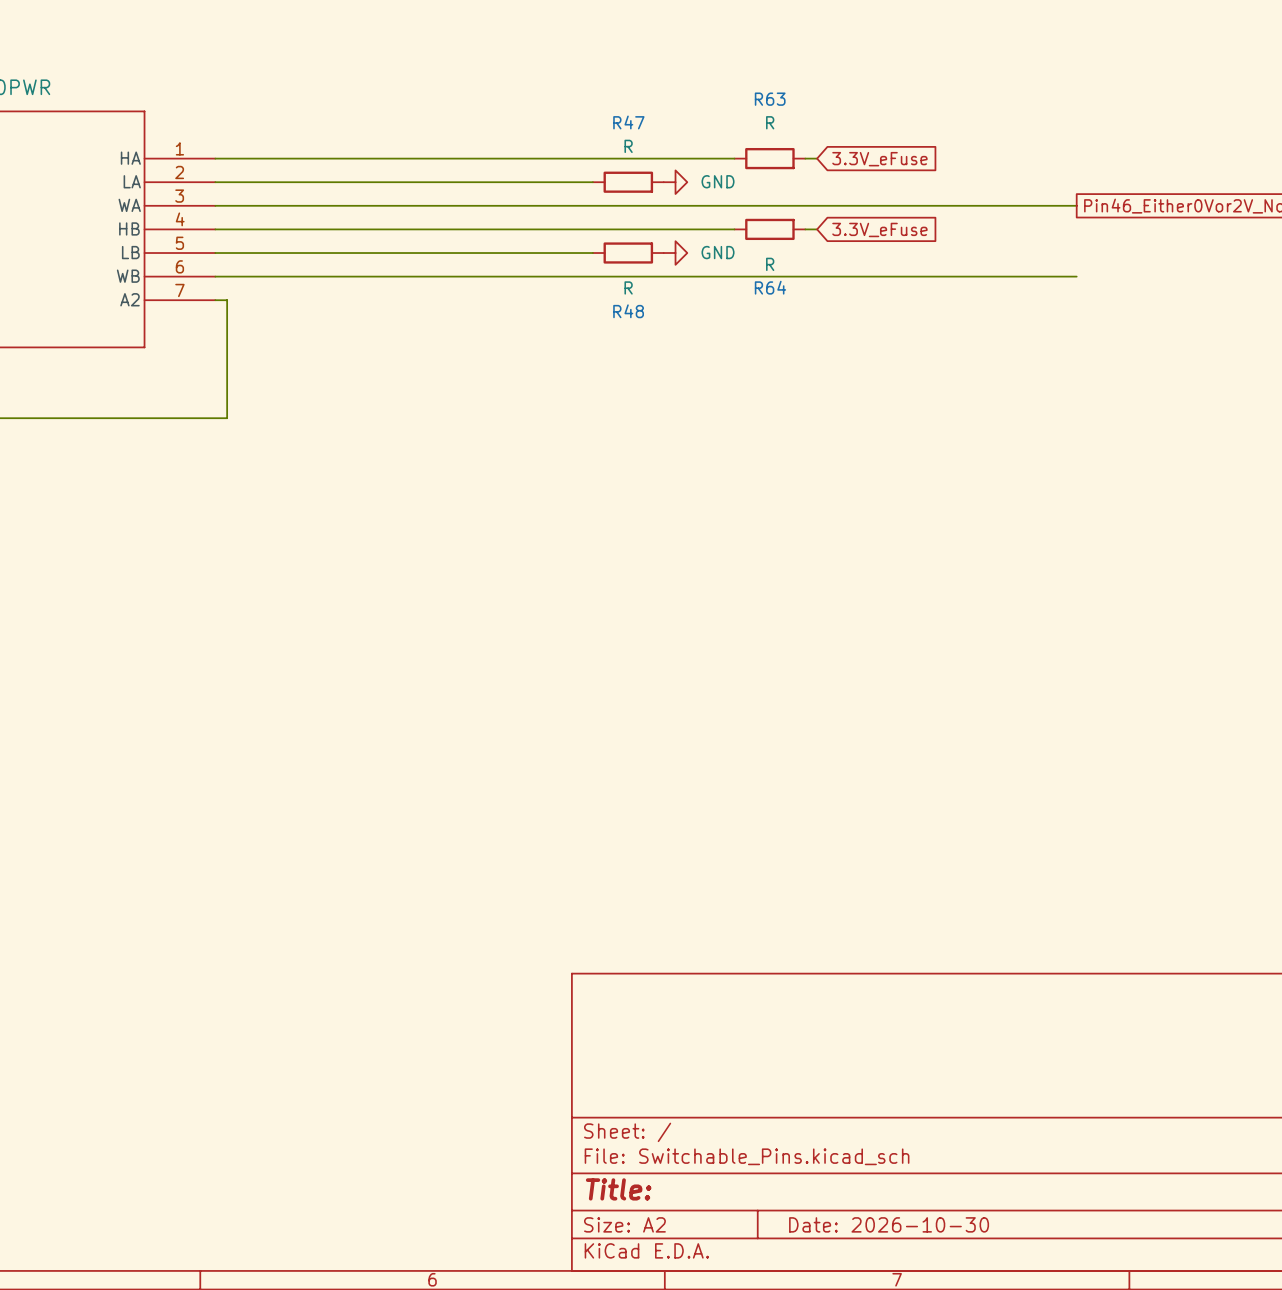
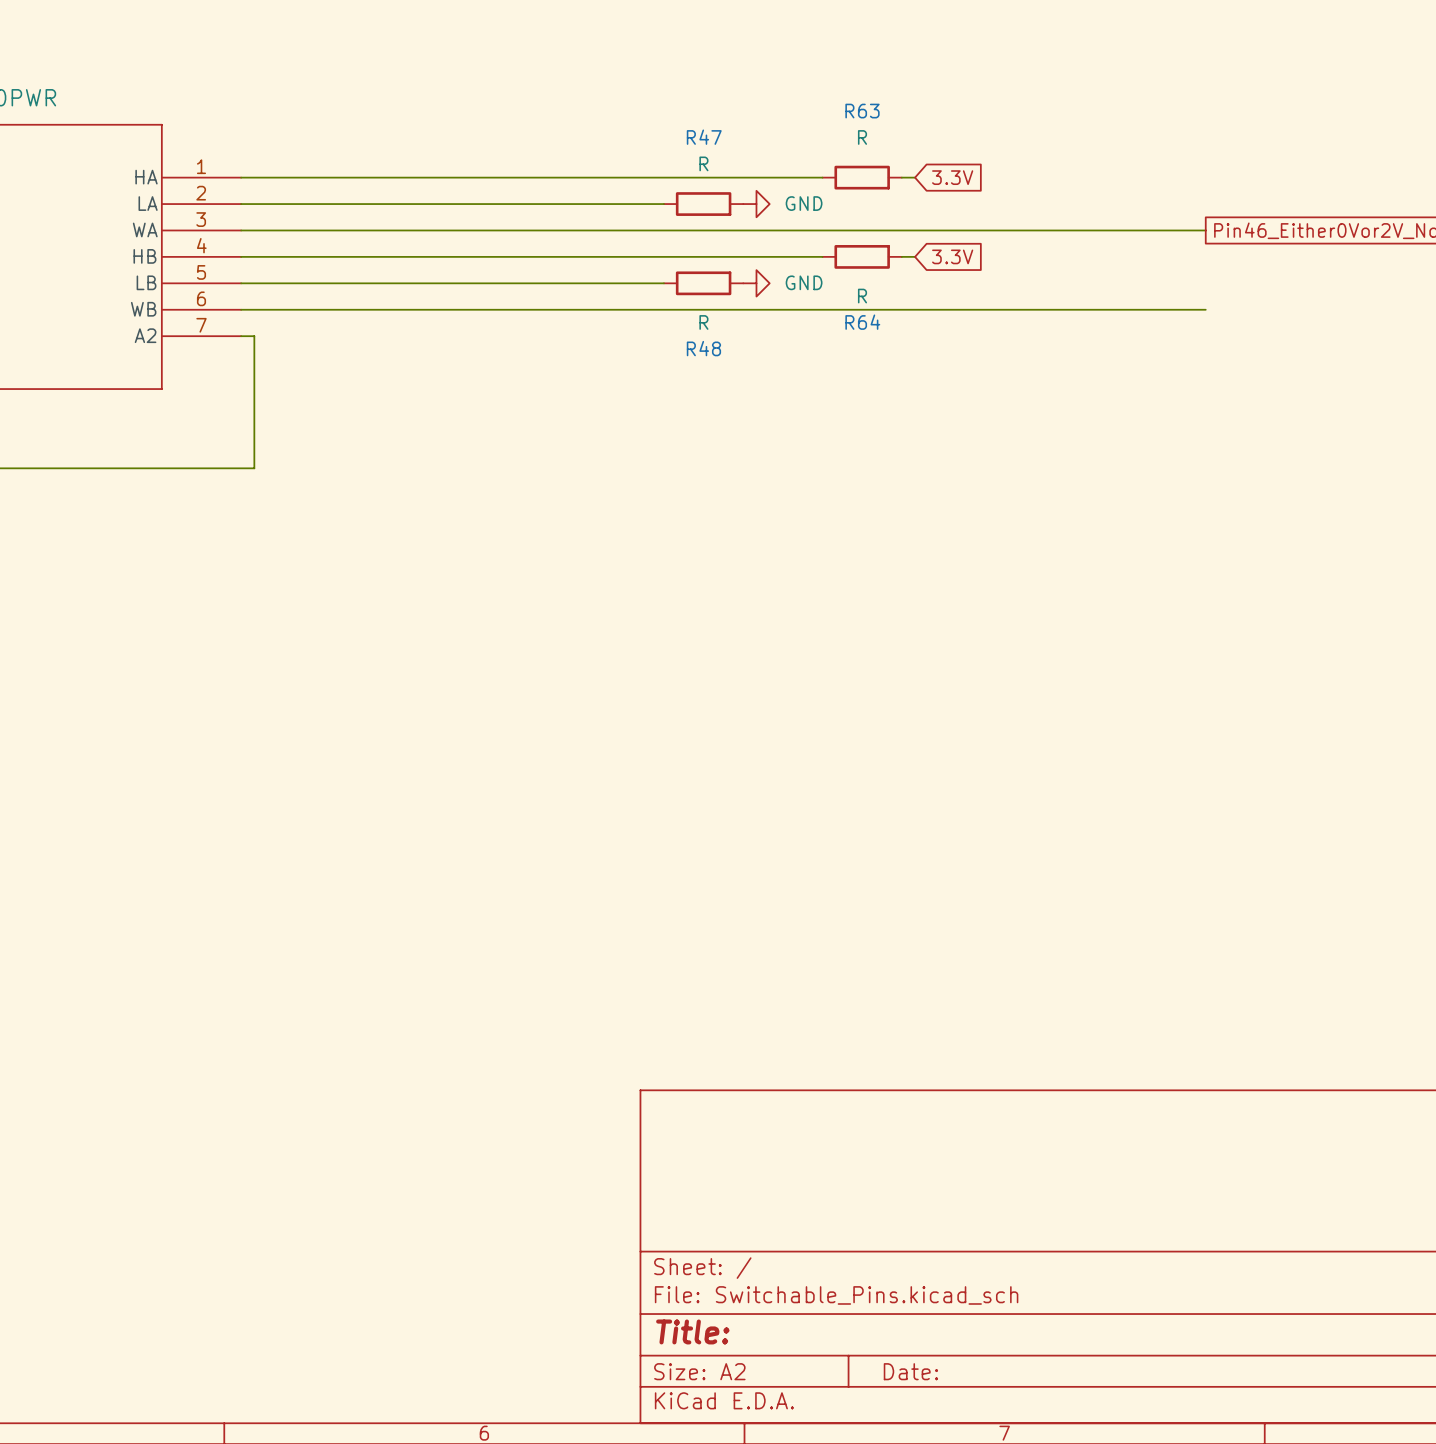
global label: 3.3V_eFuse (879, 159) -> 3.3V (952, 177)
global label: 3.3V_eFuse (879, 229) -> 3.3V (952, 256)
title block: Date: 2026-10-30 (889, 1224) -> Date: (910, 1371)

